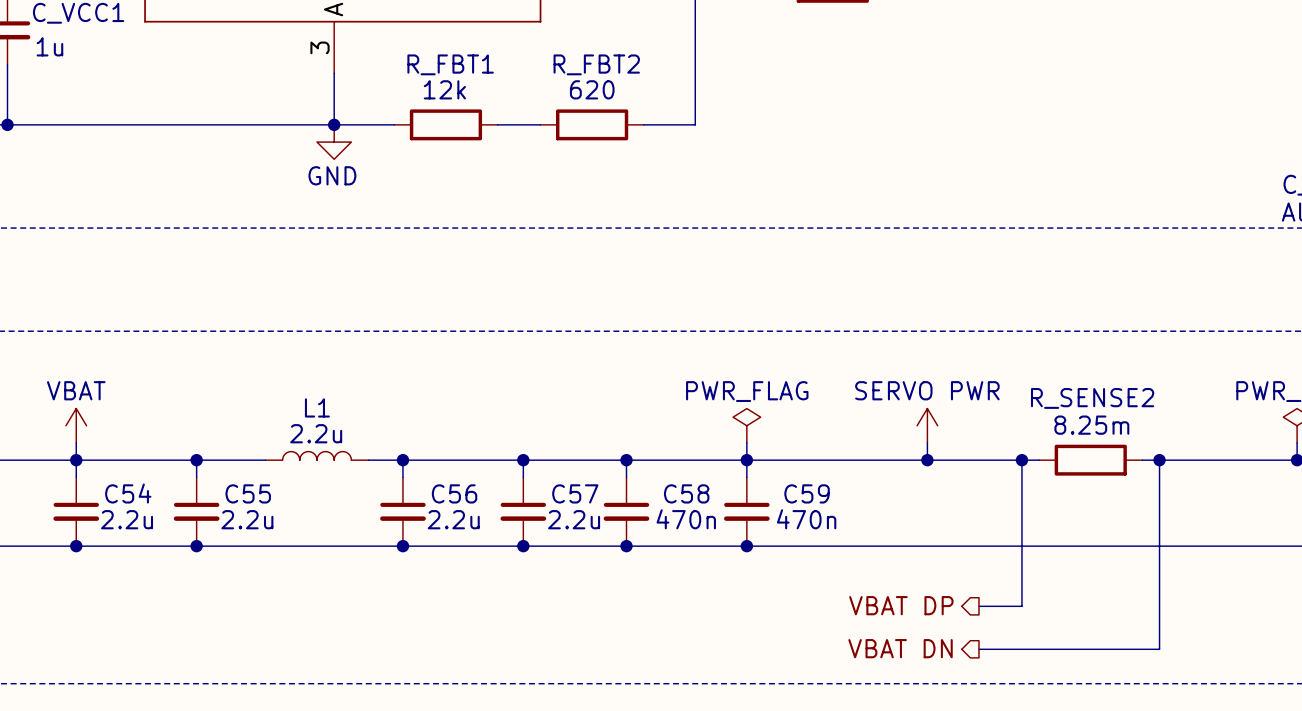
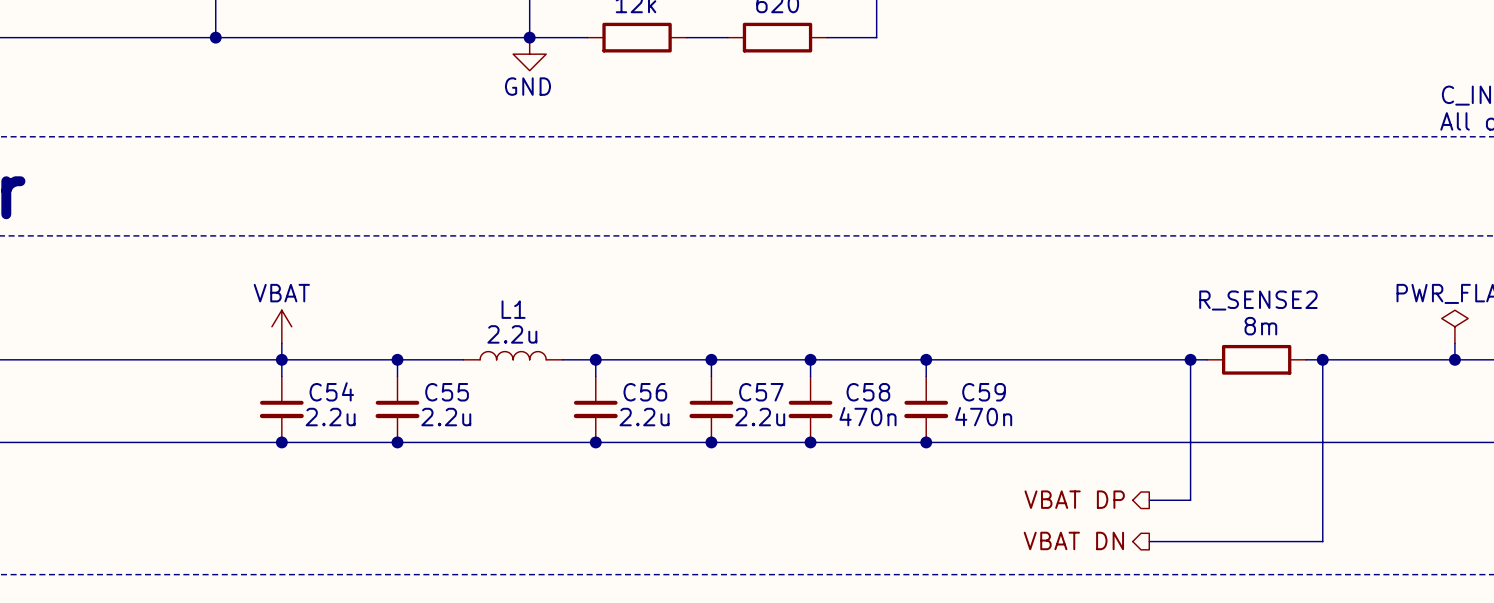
power symbol: PWR_FLAG (746, 425) -> none
power symbol: SERVO PWR (927, 425) -> none
R_SENSE2 value: 8.25m (1091, 425) -> 8m (1260, 326)
wire: (746, 442) (746, 460) -> none
wire: (927, 442) (927, 460) -> none
junction: (927, 460) -> none

